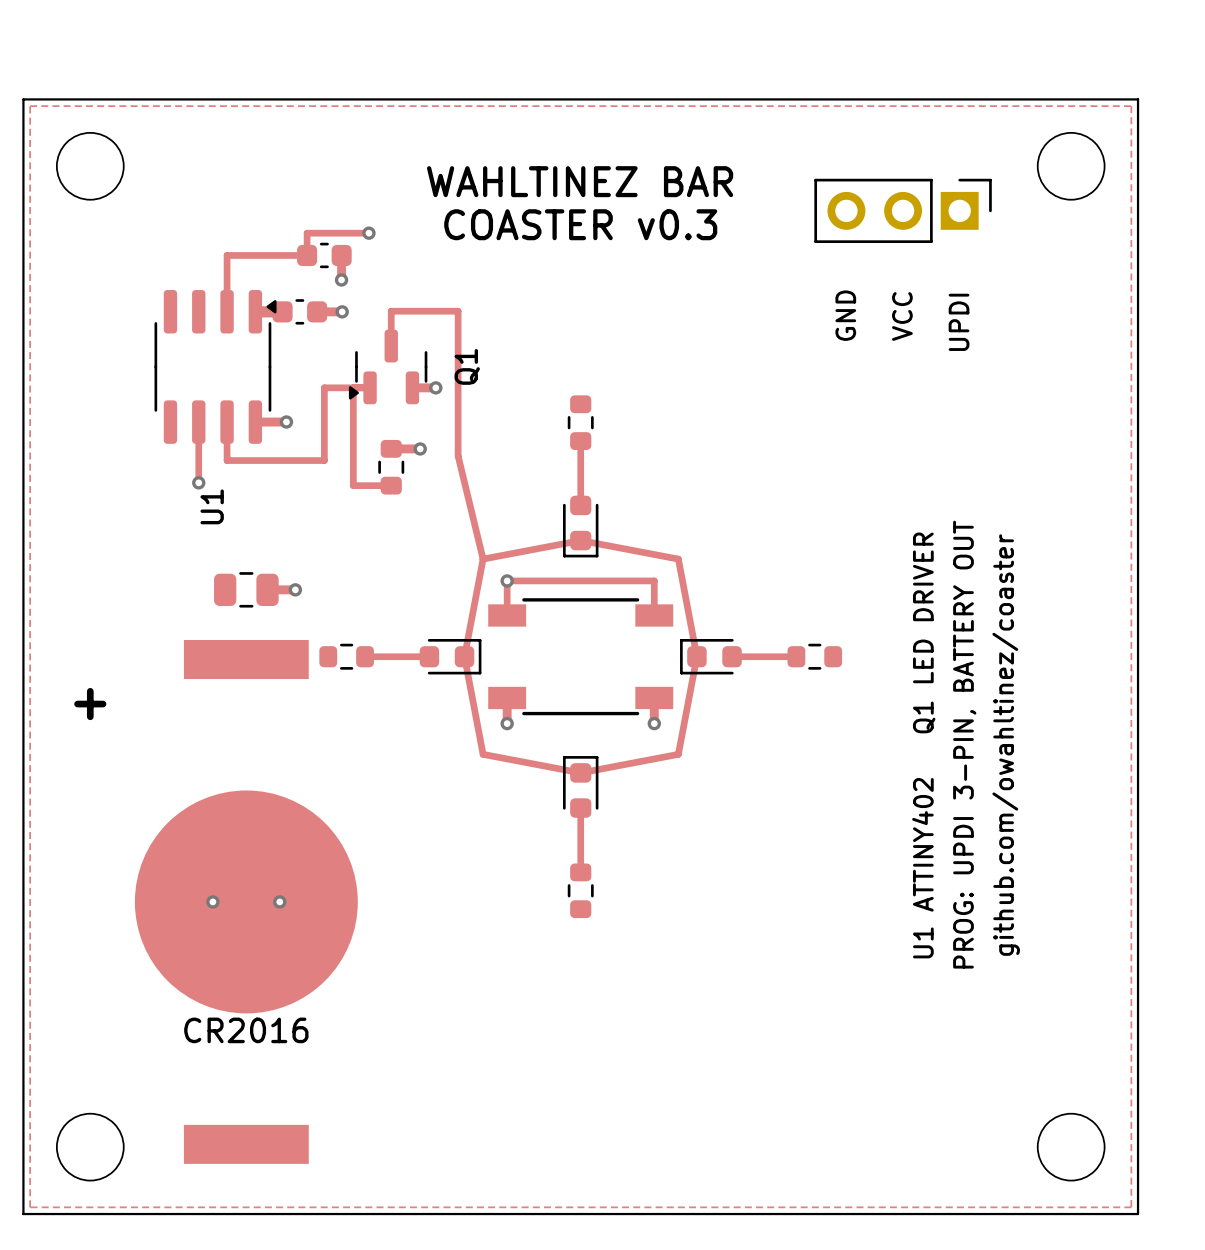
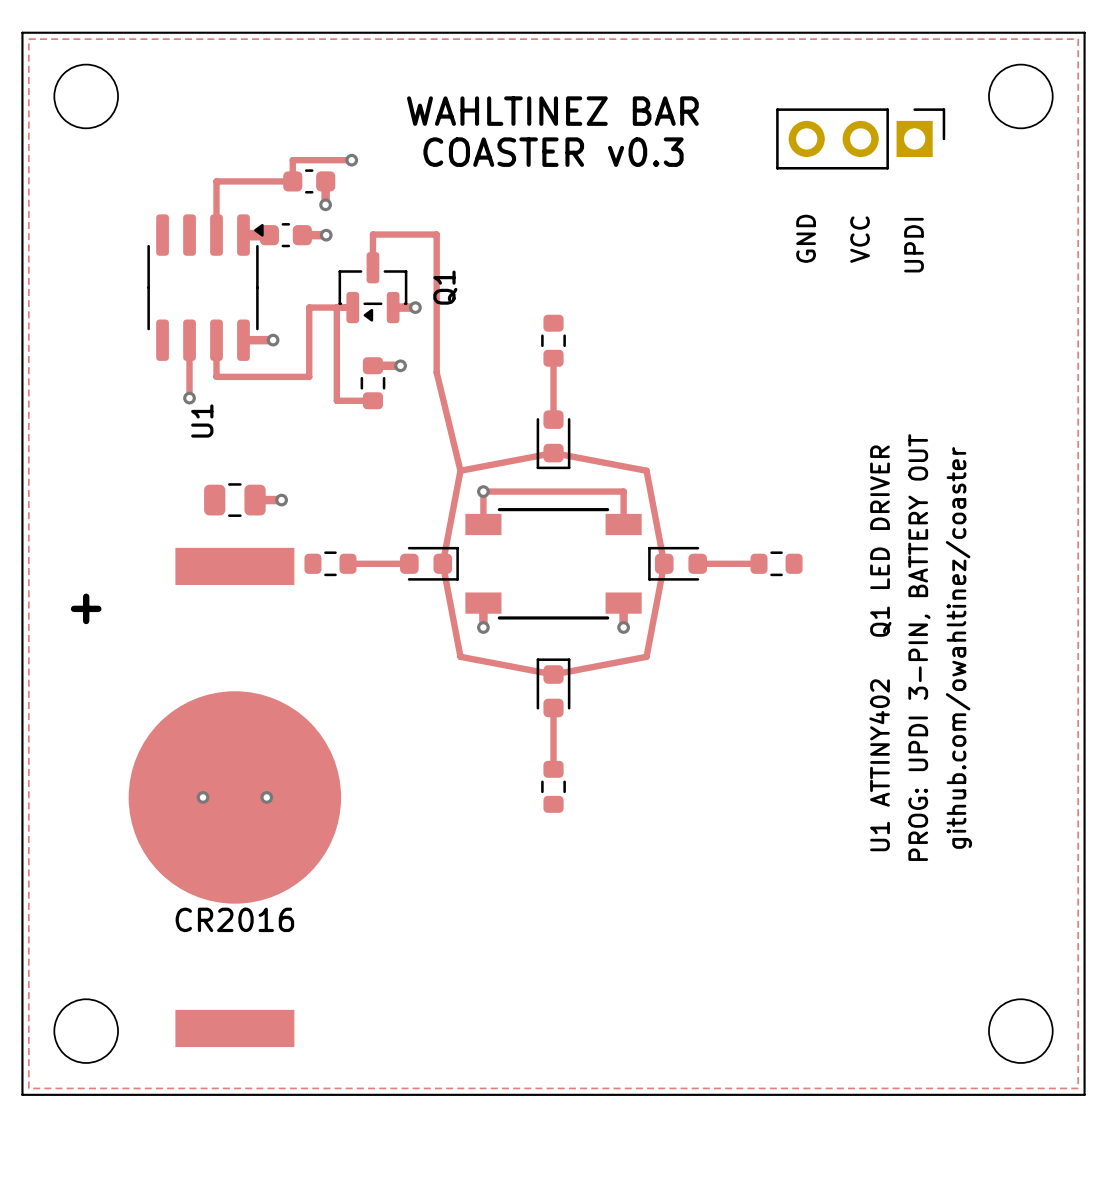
Q1 footprint: [348, 329, 428, 405] -> [338, 252, 408, 324]

